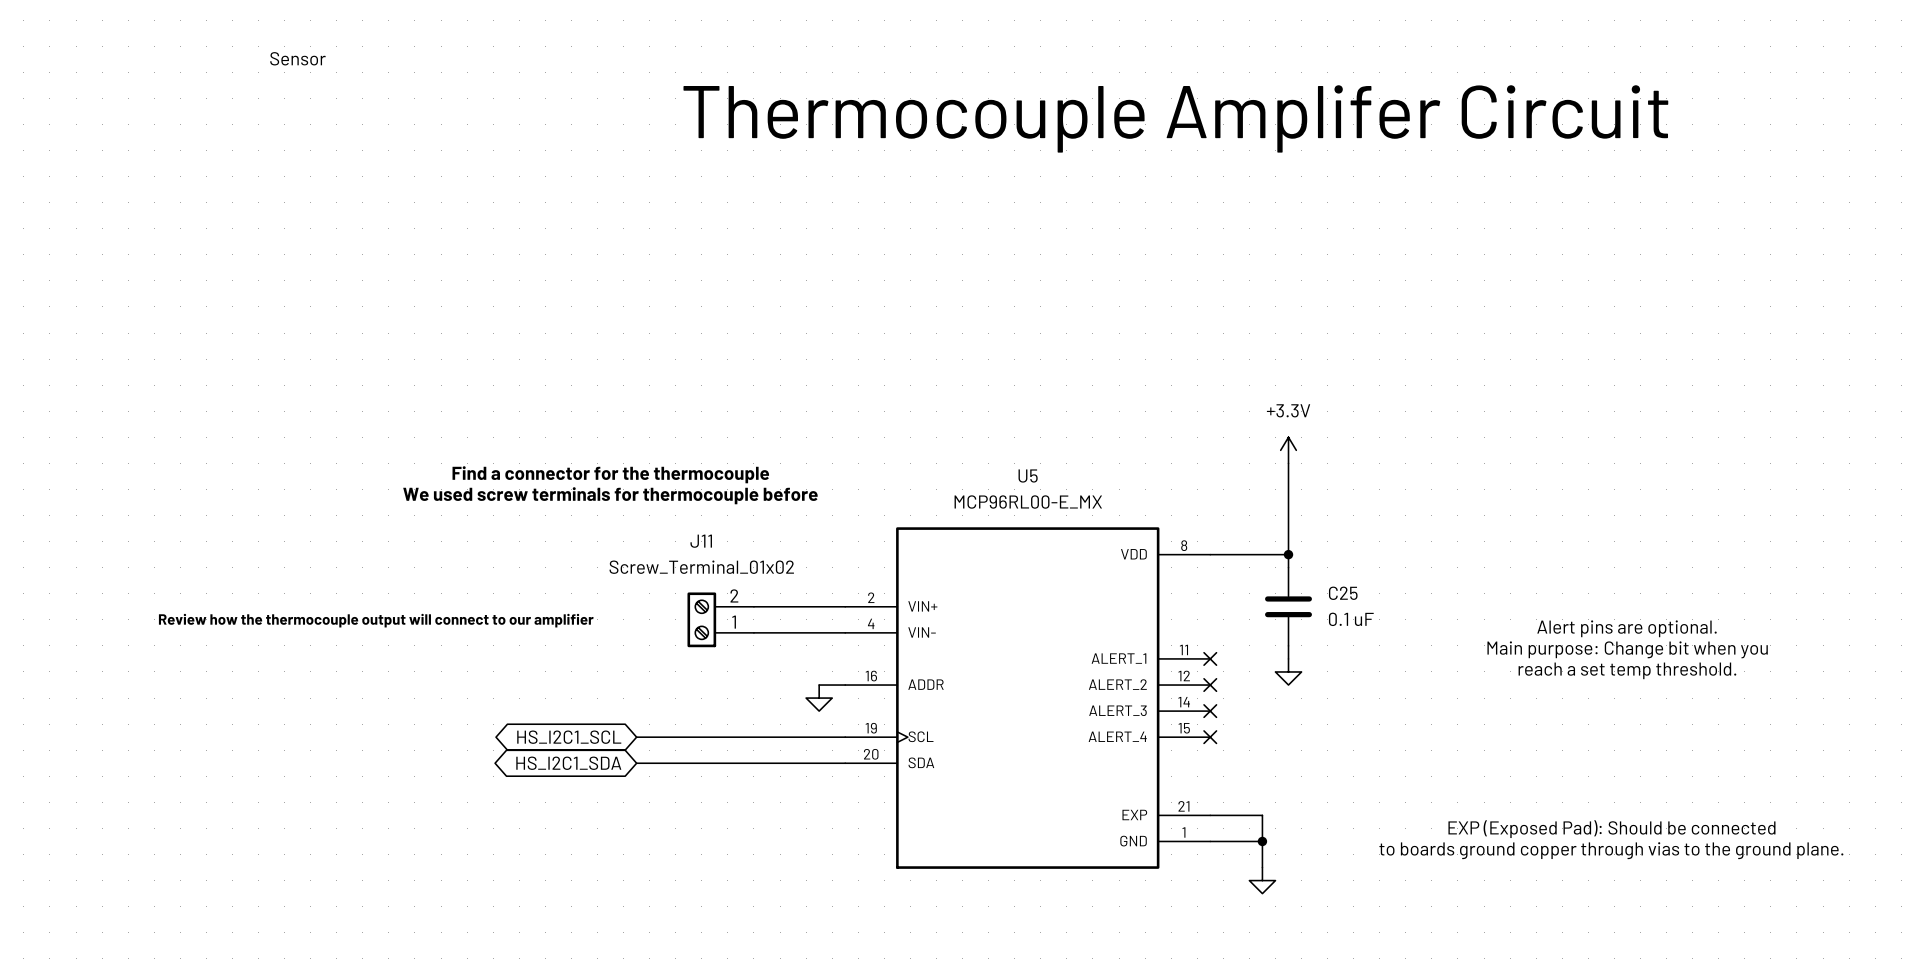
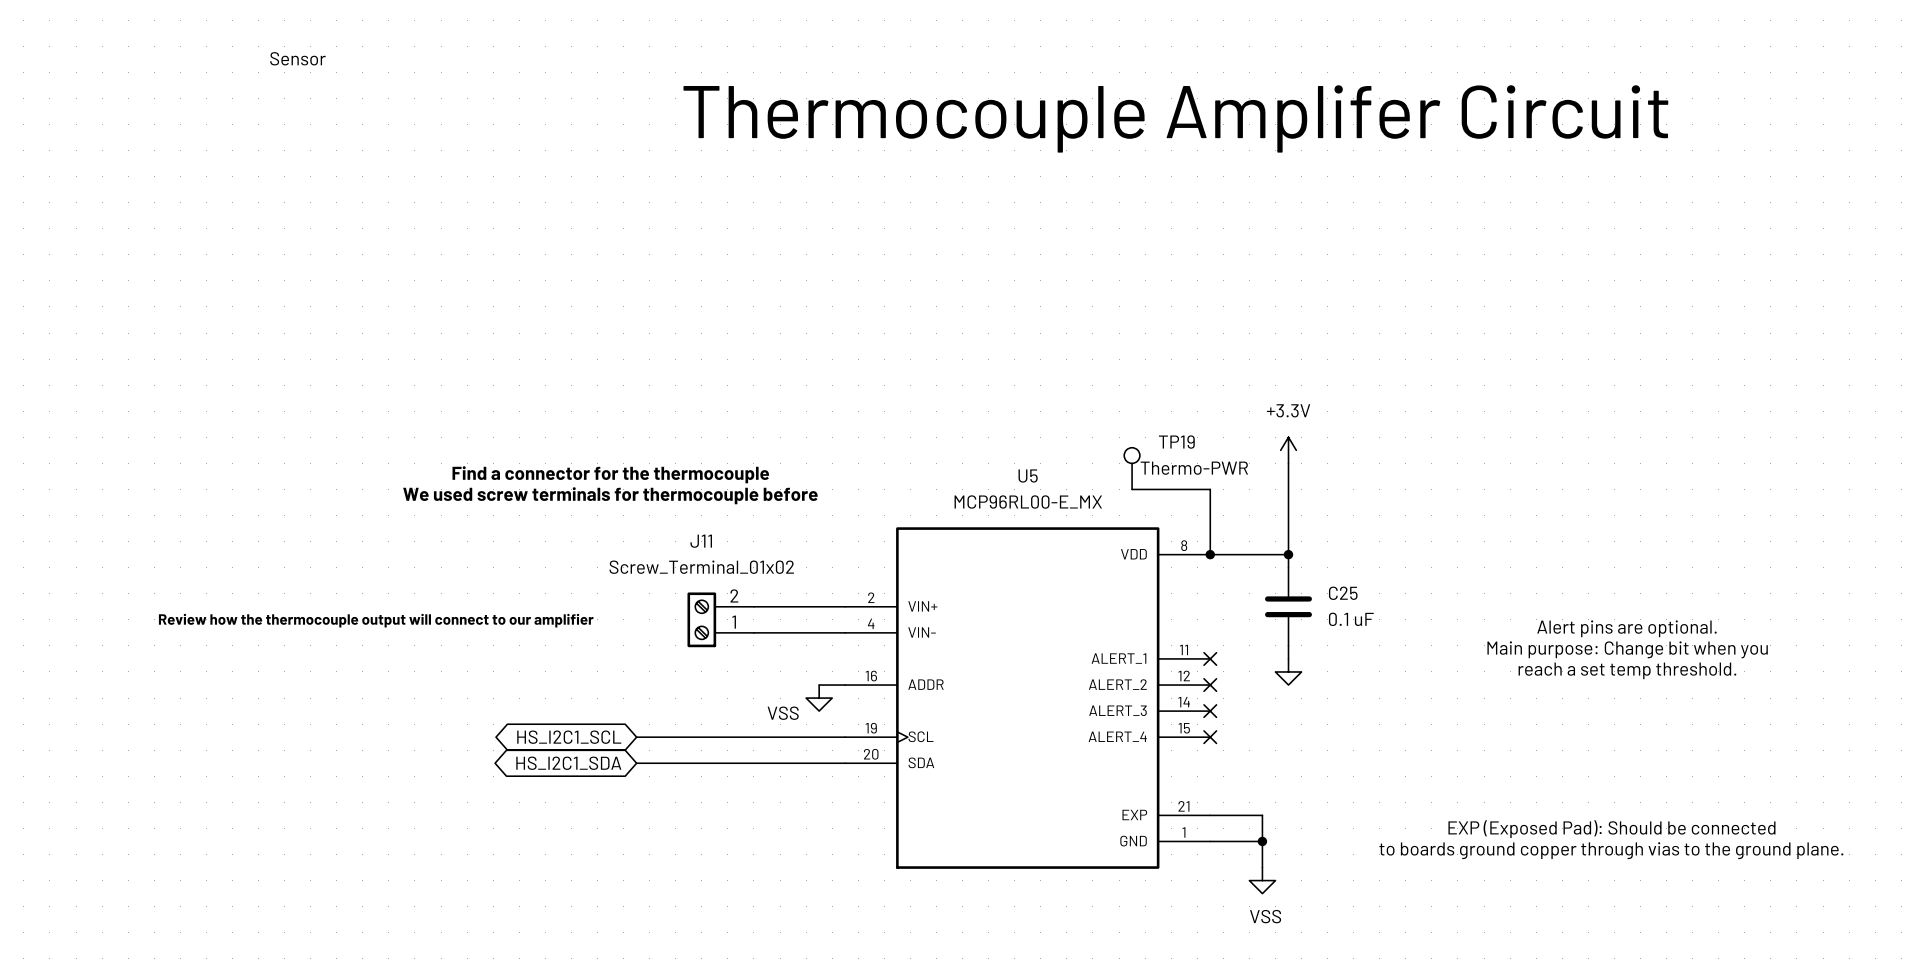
TP19: none -> Thermo-PWR (1132, 468)
wire: none -> (1132, 489) (1210, 489) (1210, 554)
junction: none -> (1210, 554)
power symbol text: none -> VSS (783, 713)
power symbol text: none -> VSS (1265, 916)

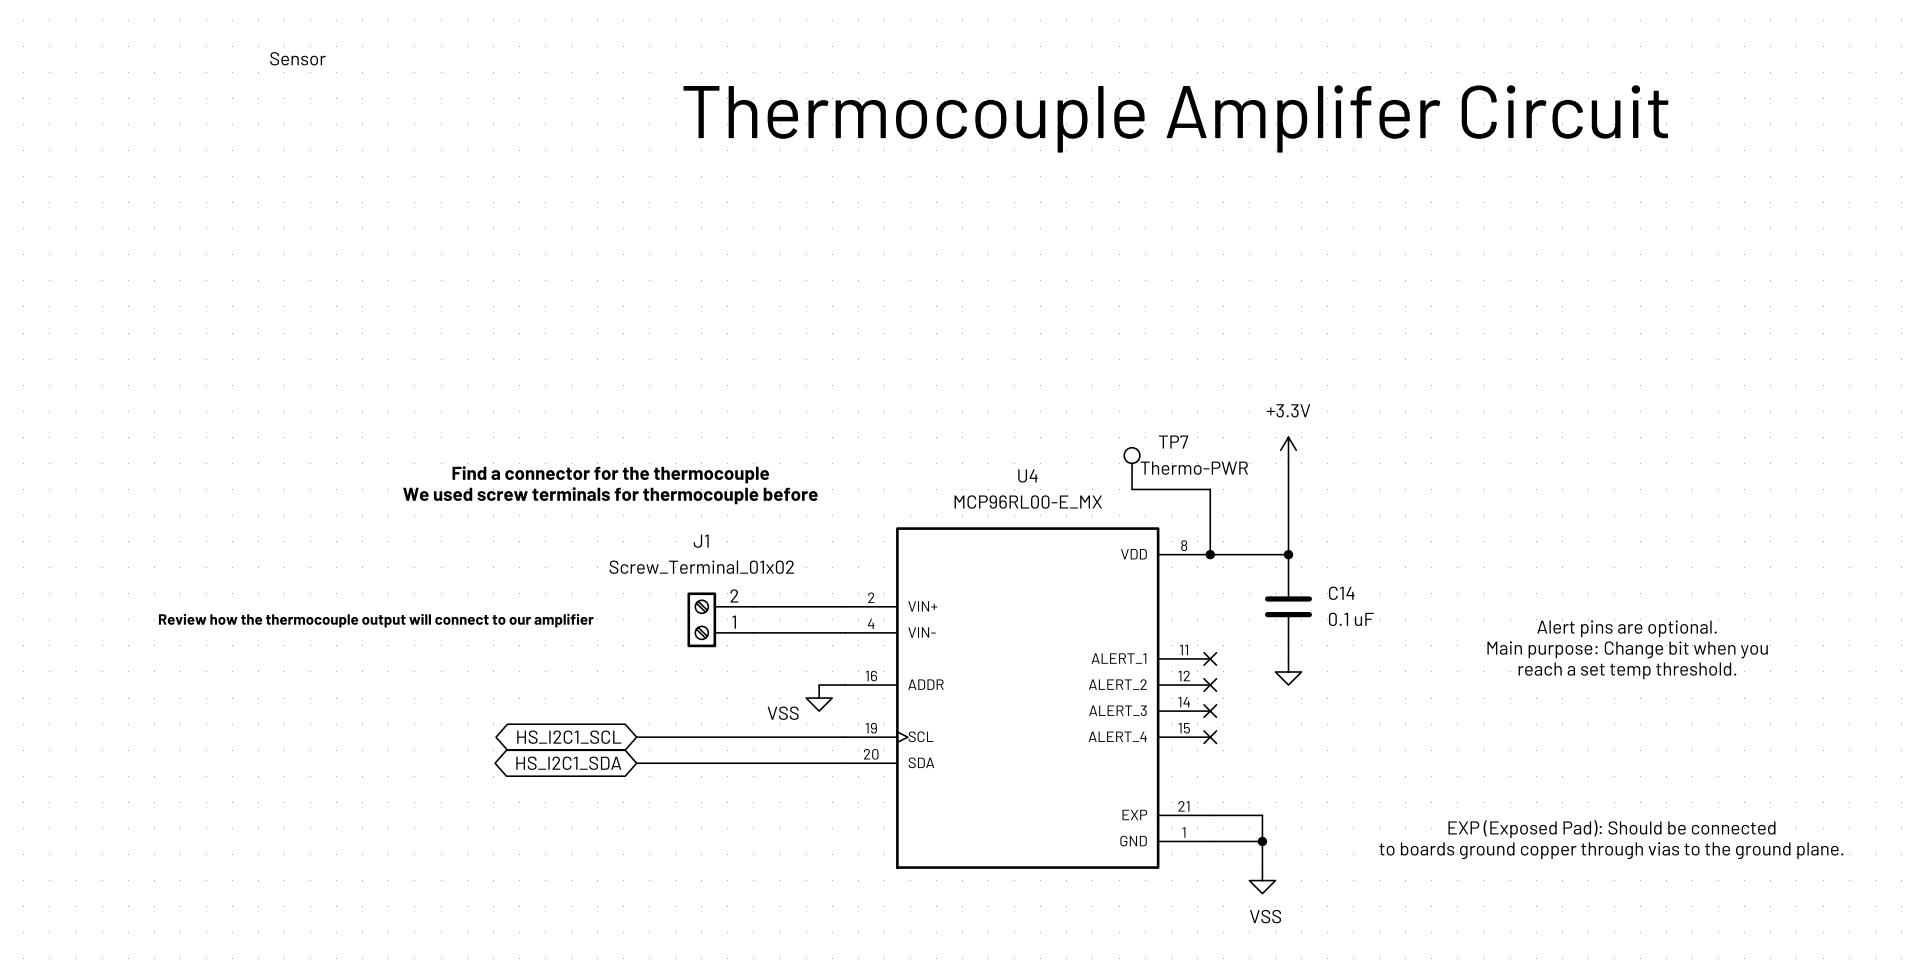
TP19 name: TP19 (1176, 442) -> TP7 (1173, 442)
U5 name: U5 (1028, 476) -> U4 (1027, 476)
J11 name: J11 (701, 541) -> J1 (701, 541)
C25 name: C25 (1343, 593) -> C14 (1341, 593)

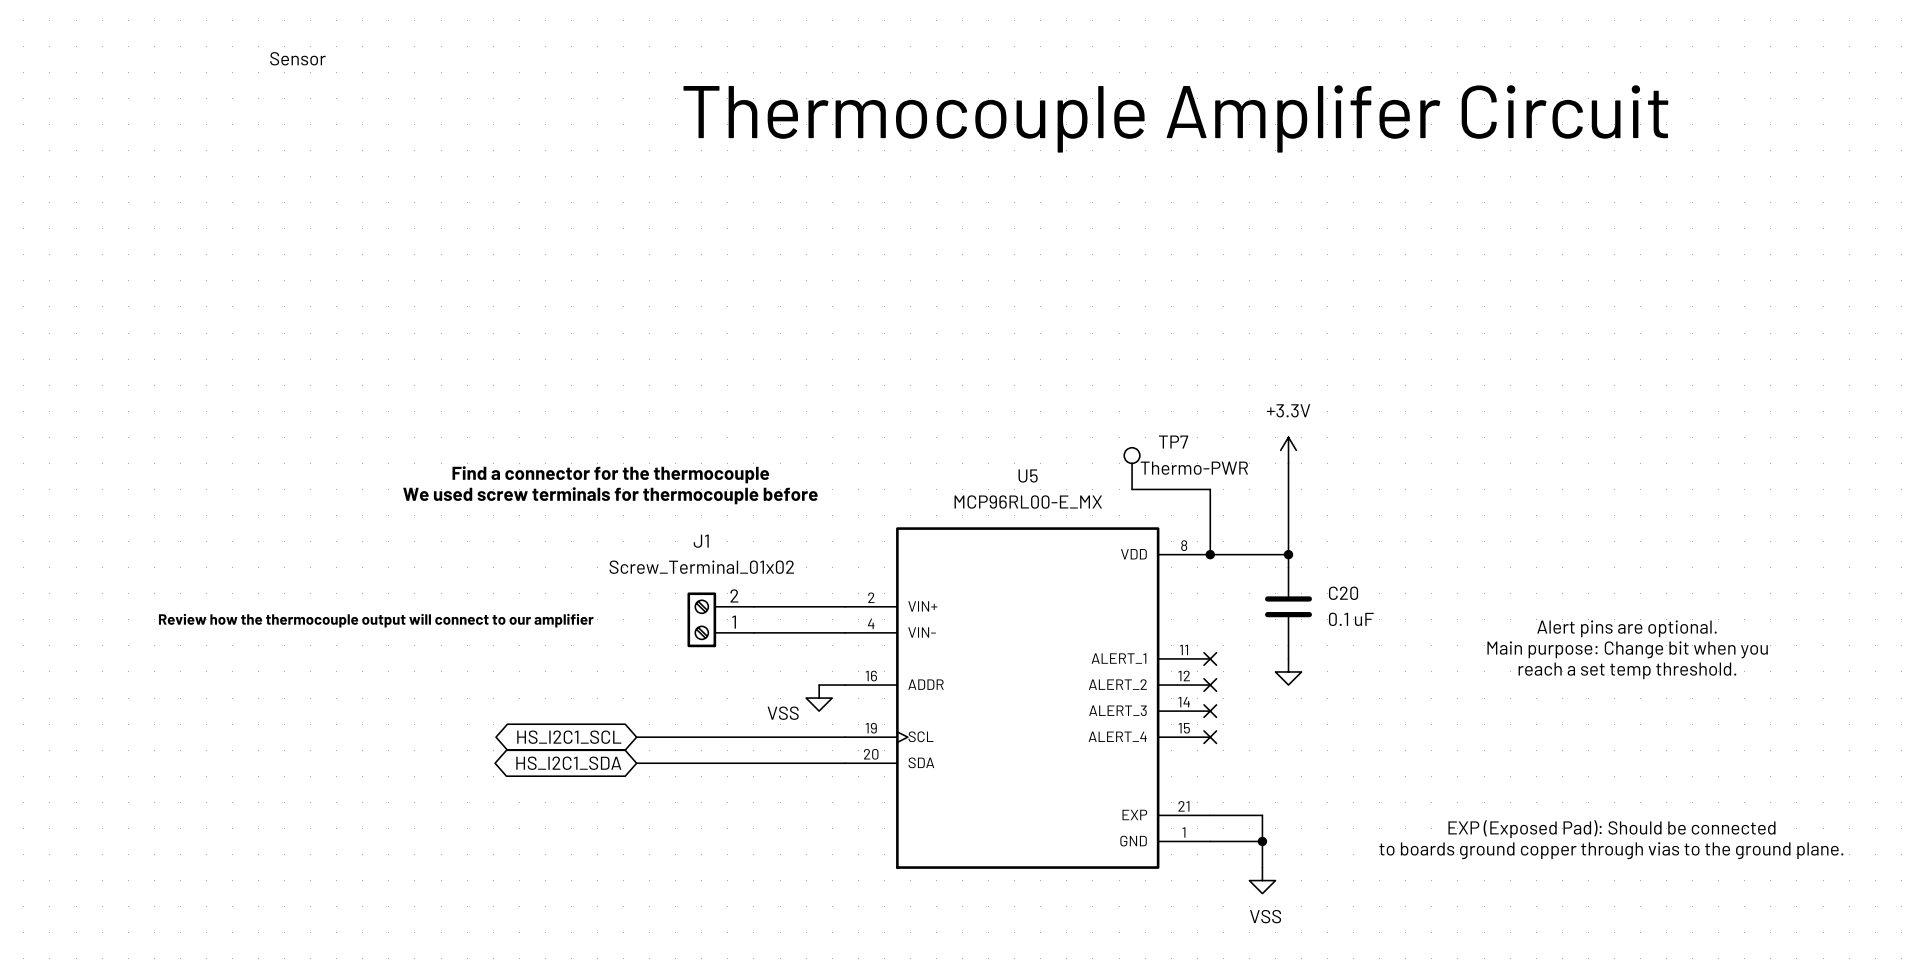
U4 name: U4 (1027, 476) -> U5 (1028, 476)
C14 name: C14 (1341, 593) -> C20 (1343, 593)

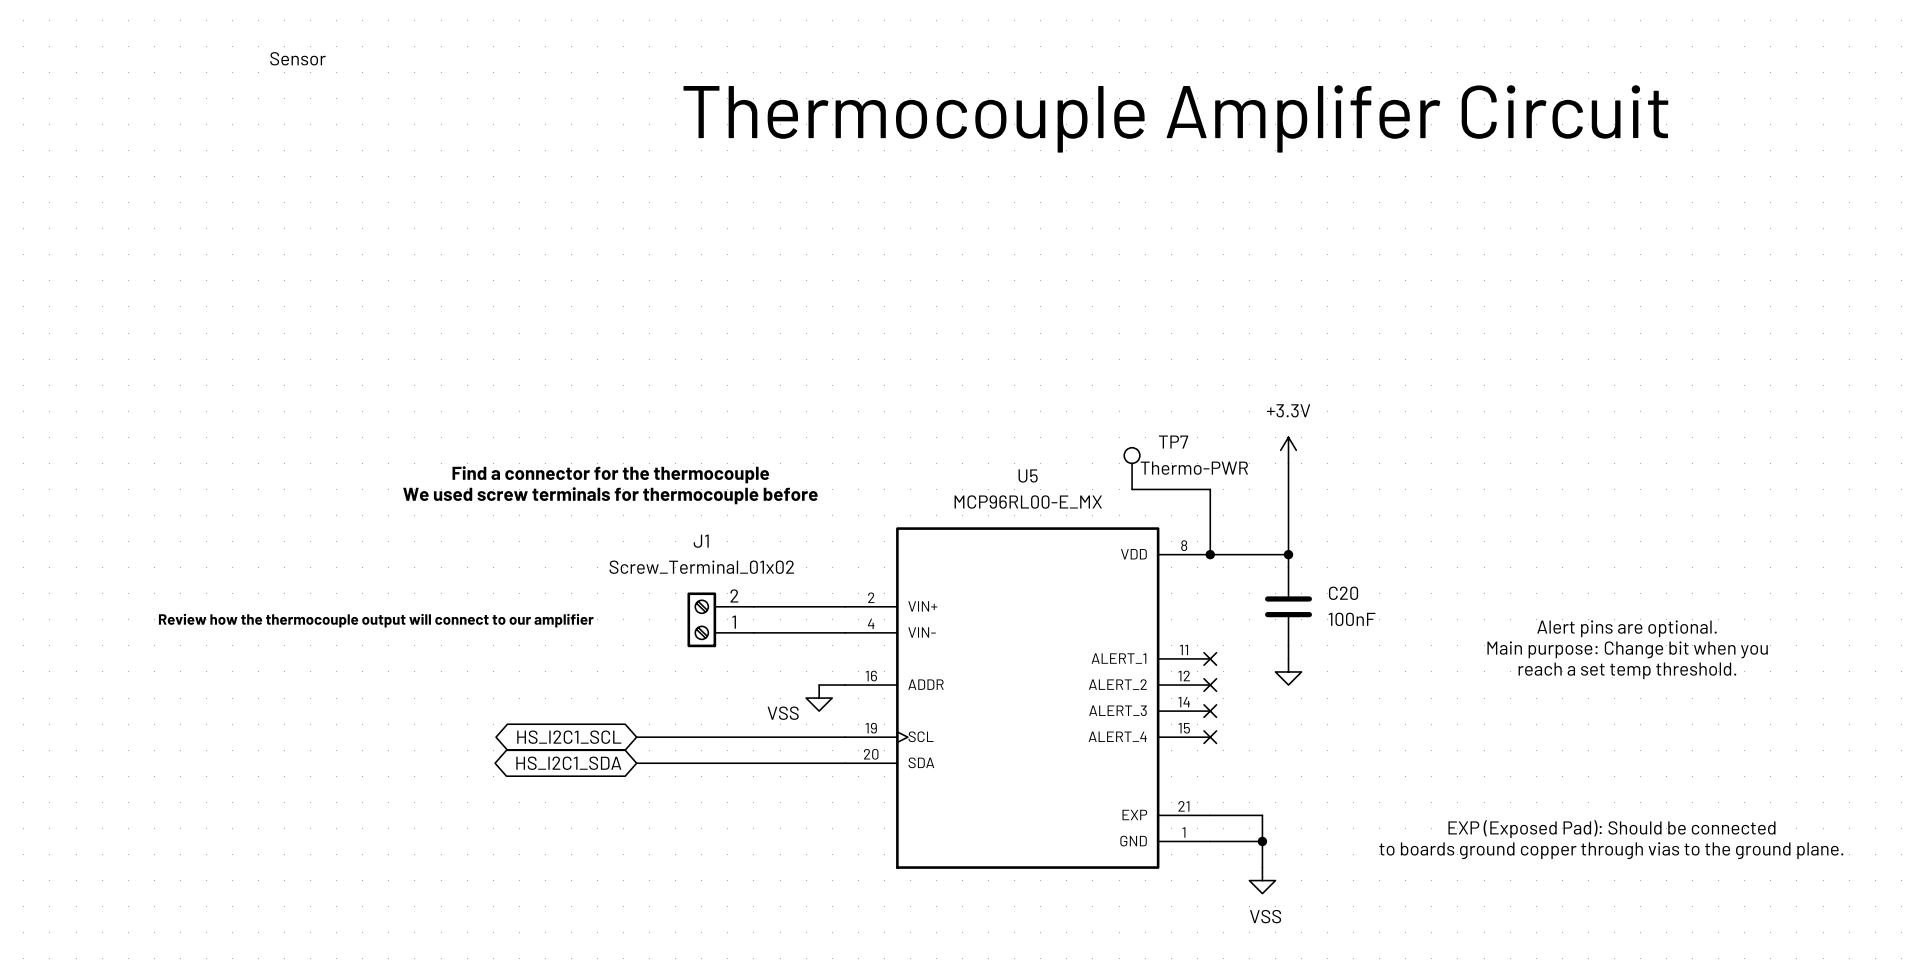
C20 value: 0.1 uF (1351, 619) -> 100nF (1352, 619)

